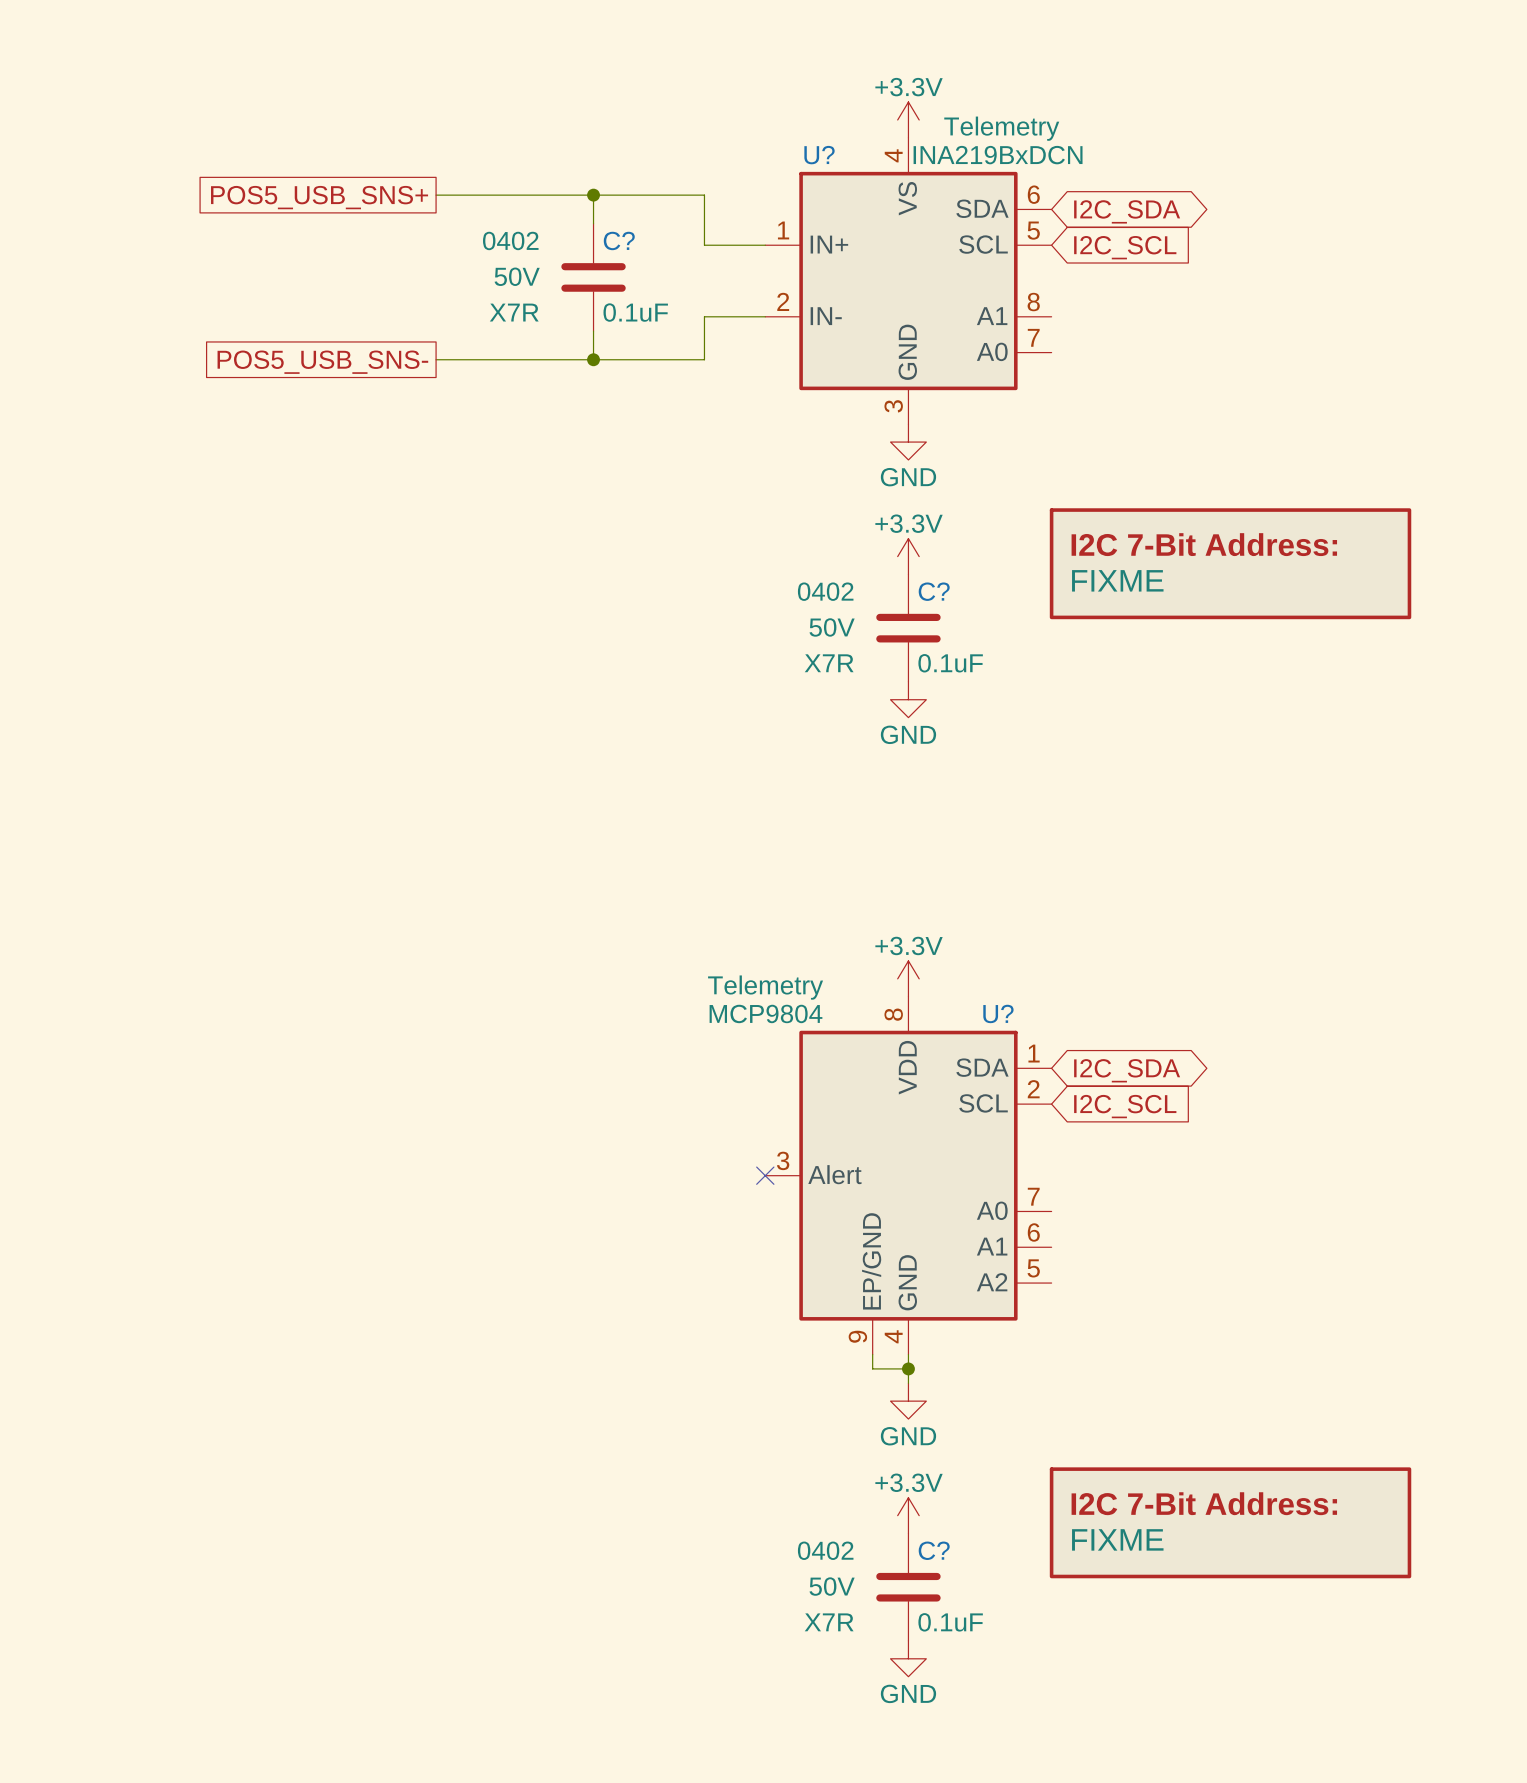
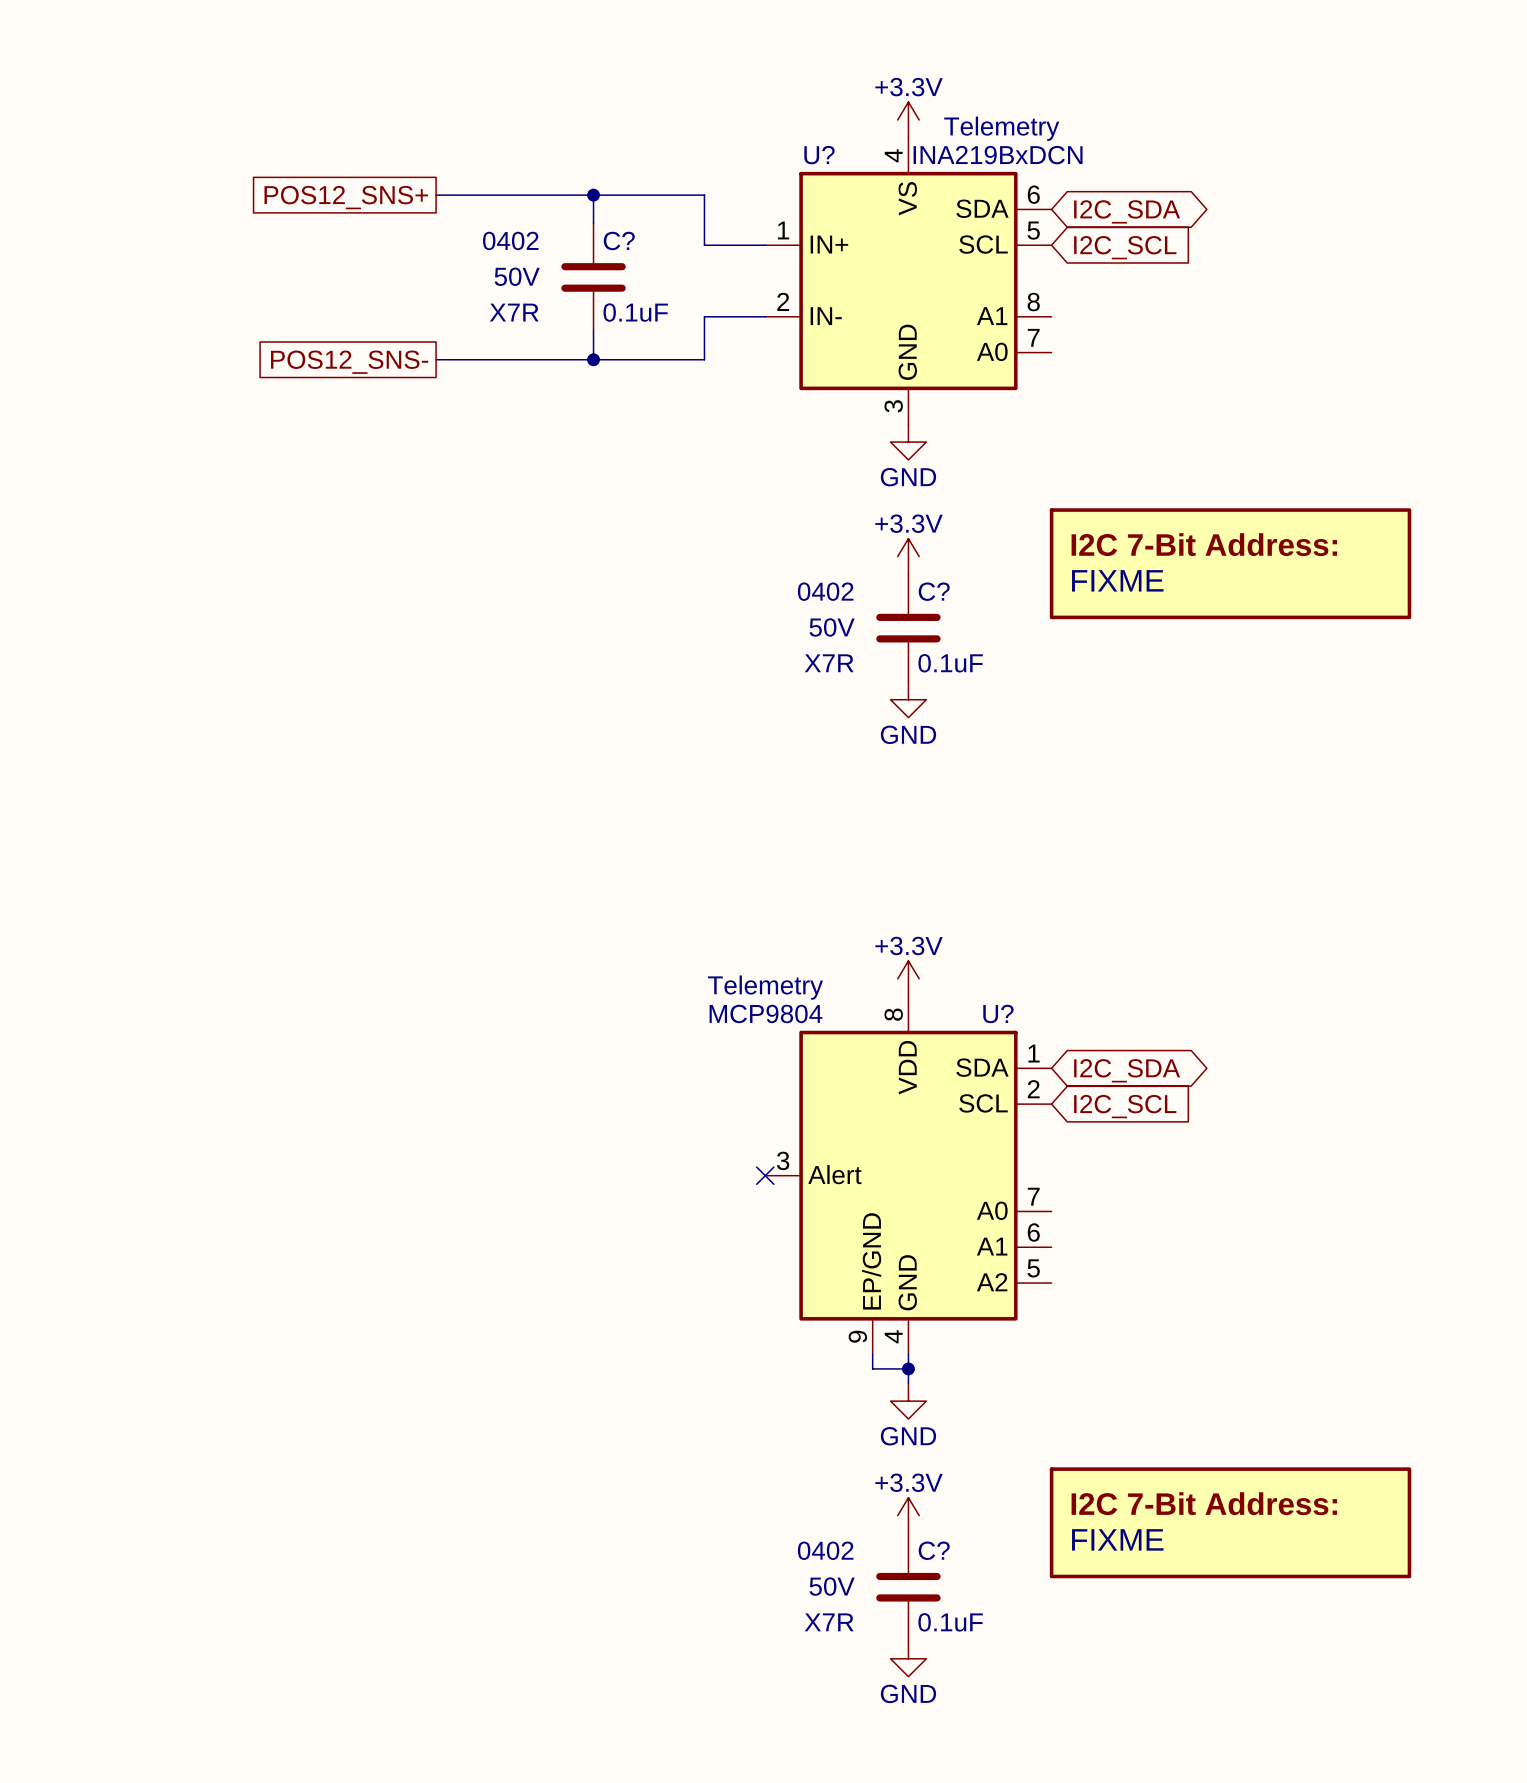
global label: POS5_USB_SNS+ (319, 197) -> POS12_SNS+ (346, 197)
global label: POS5_USB_SNS- (322, 362) -> POS12_SNS- (349, 362)

